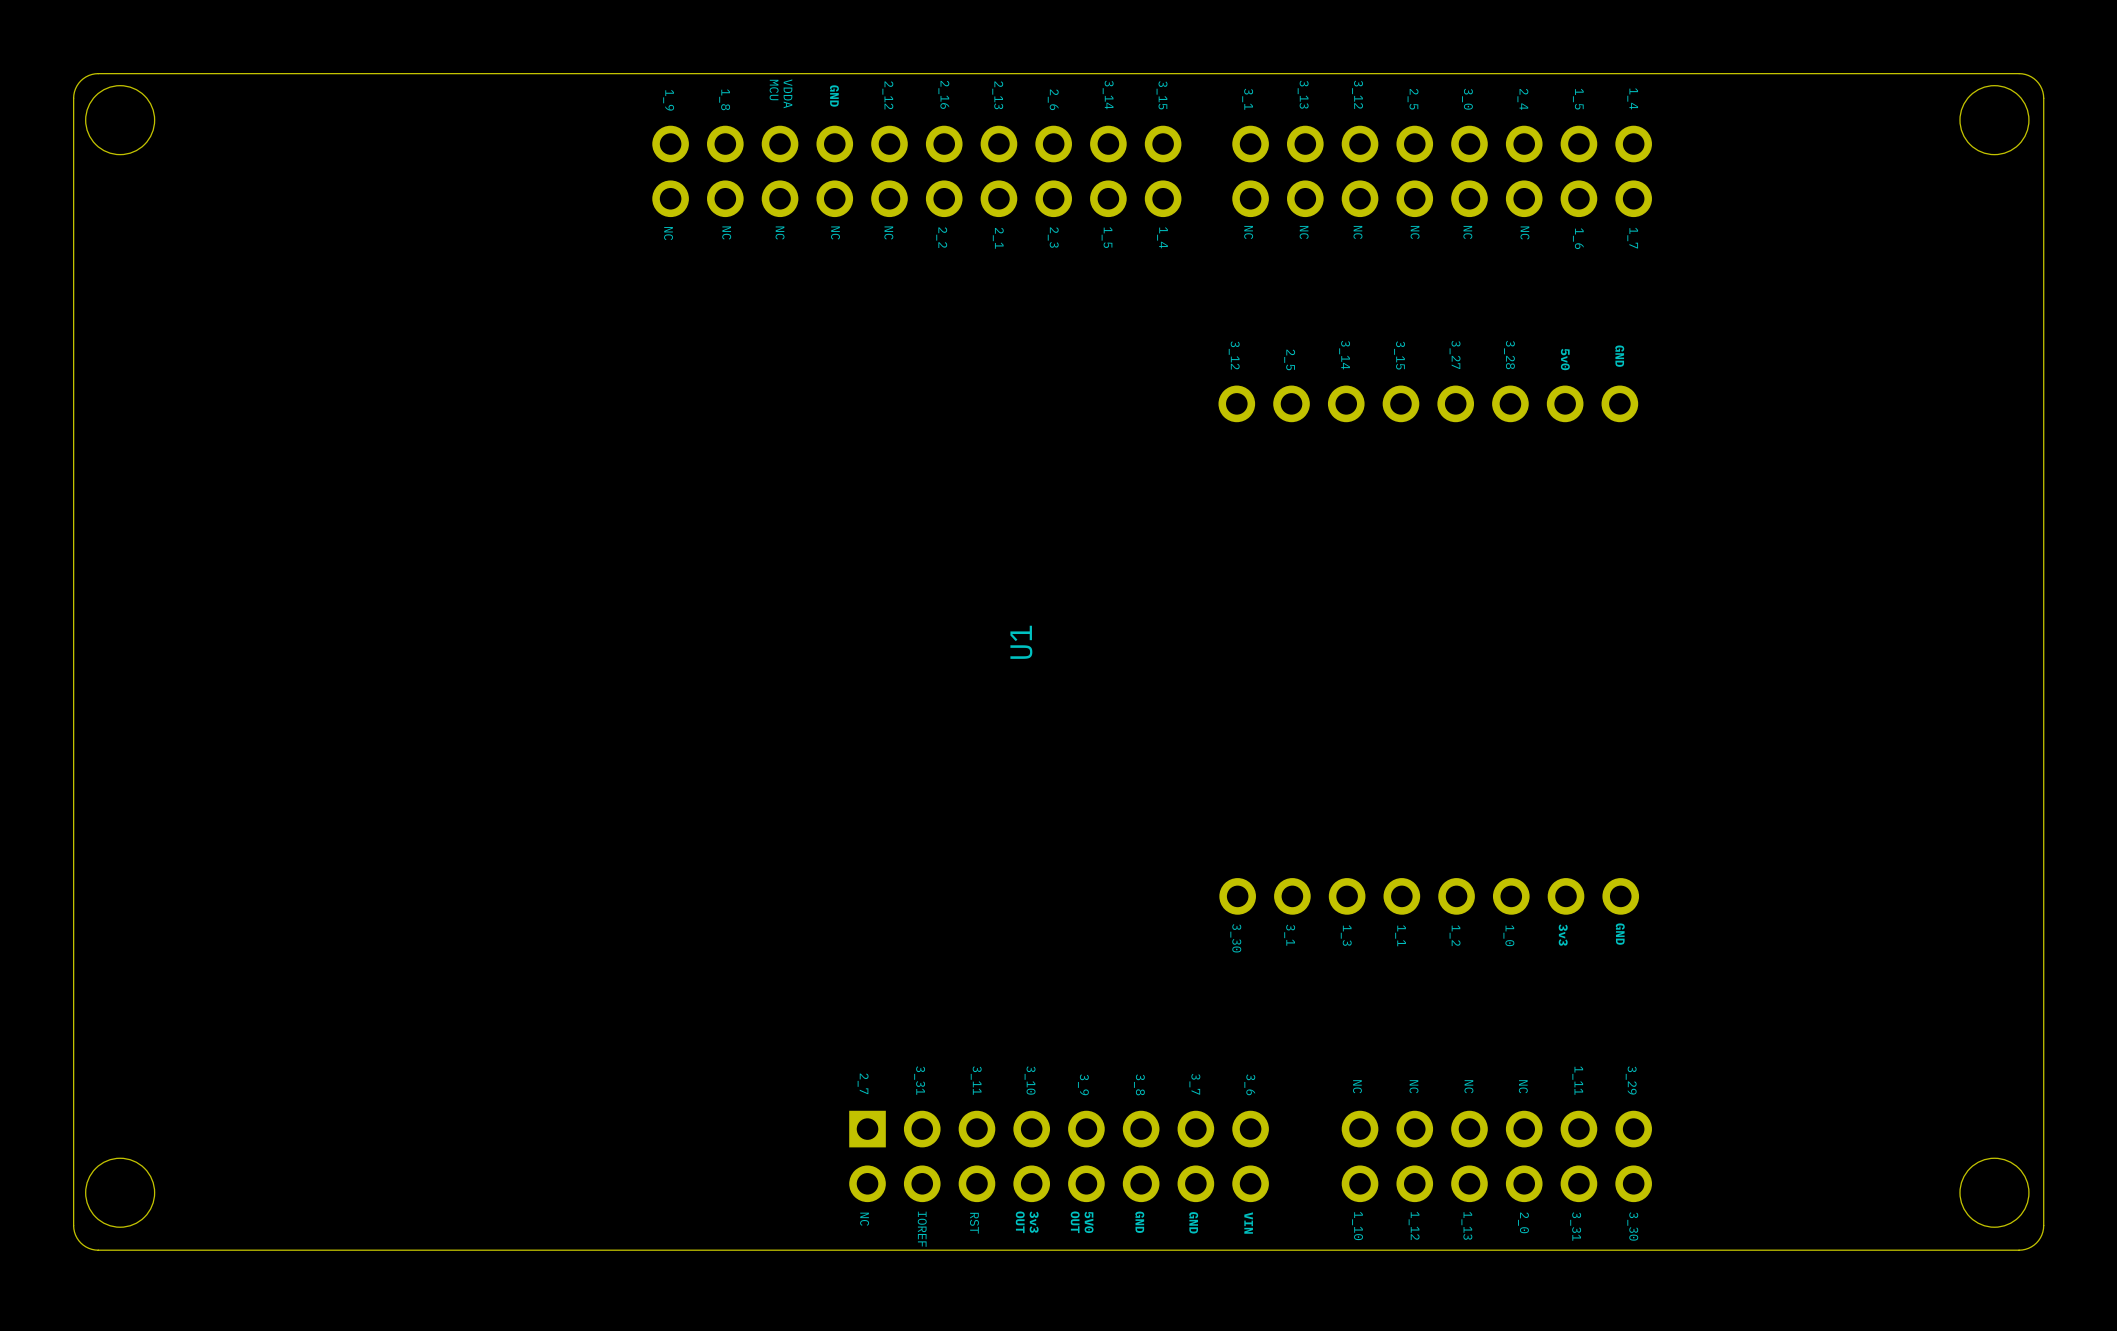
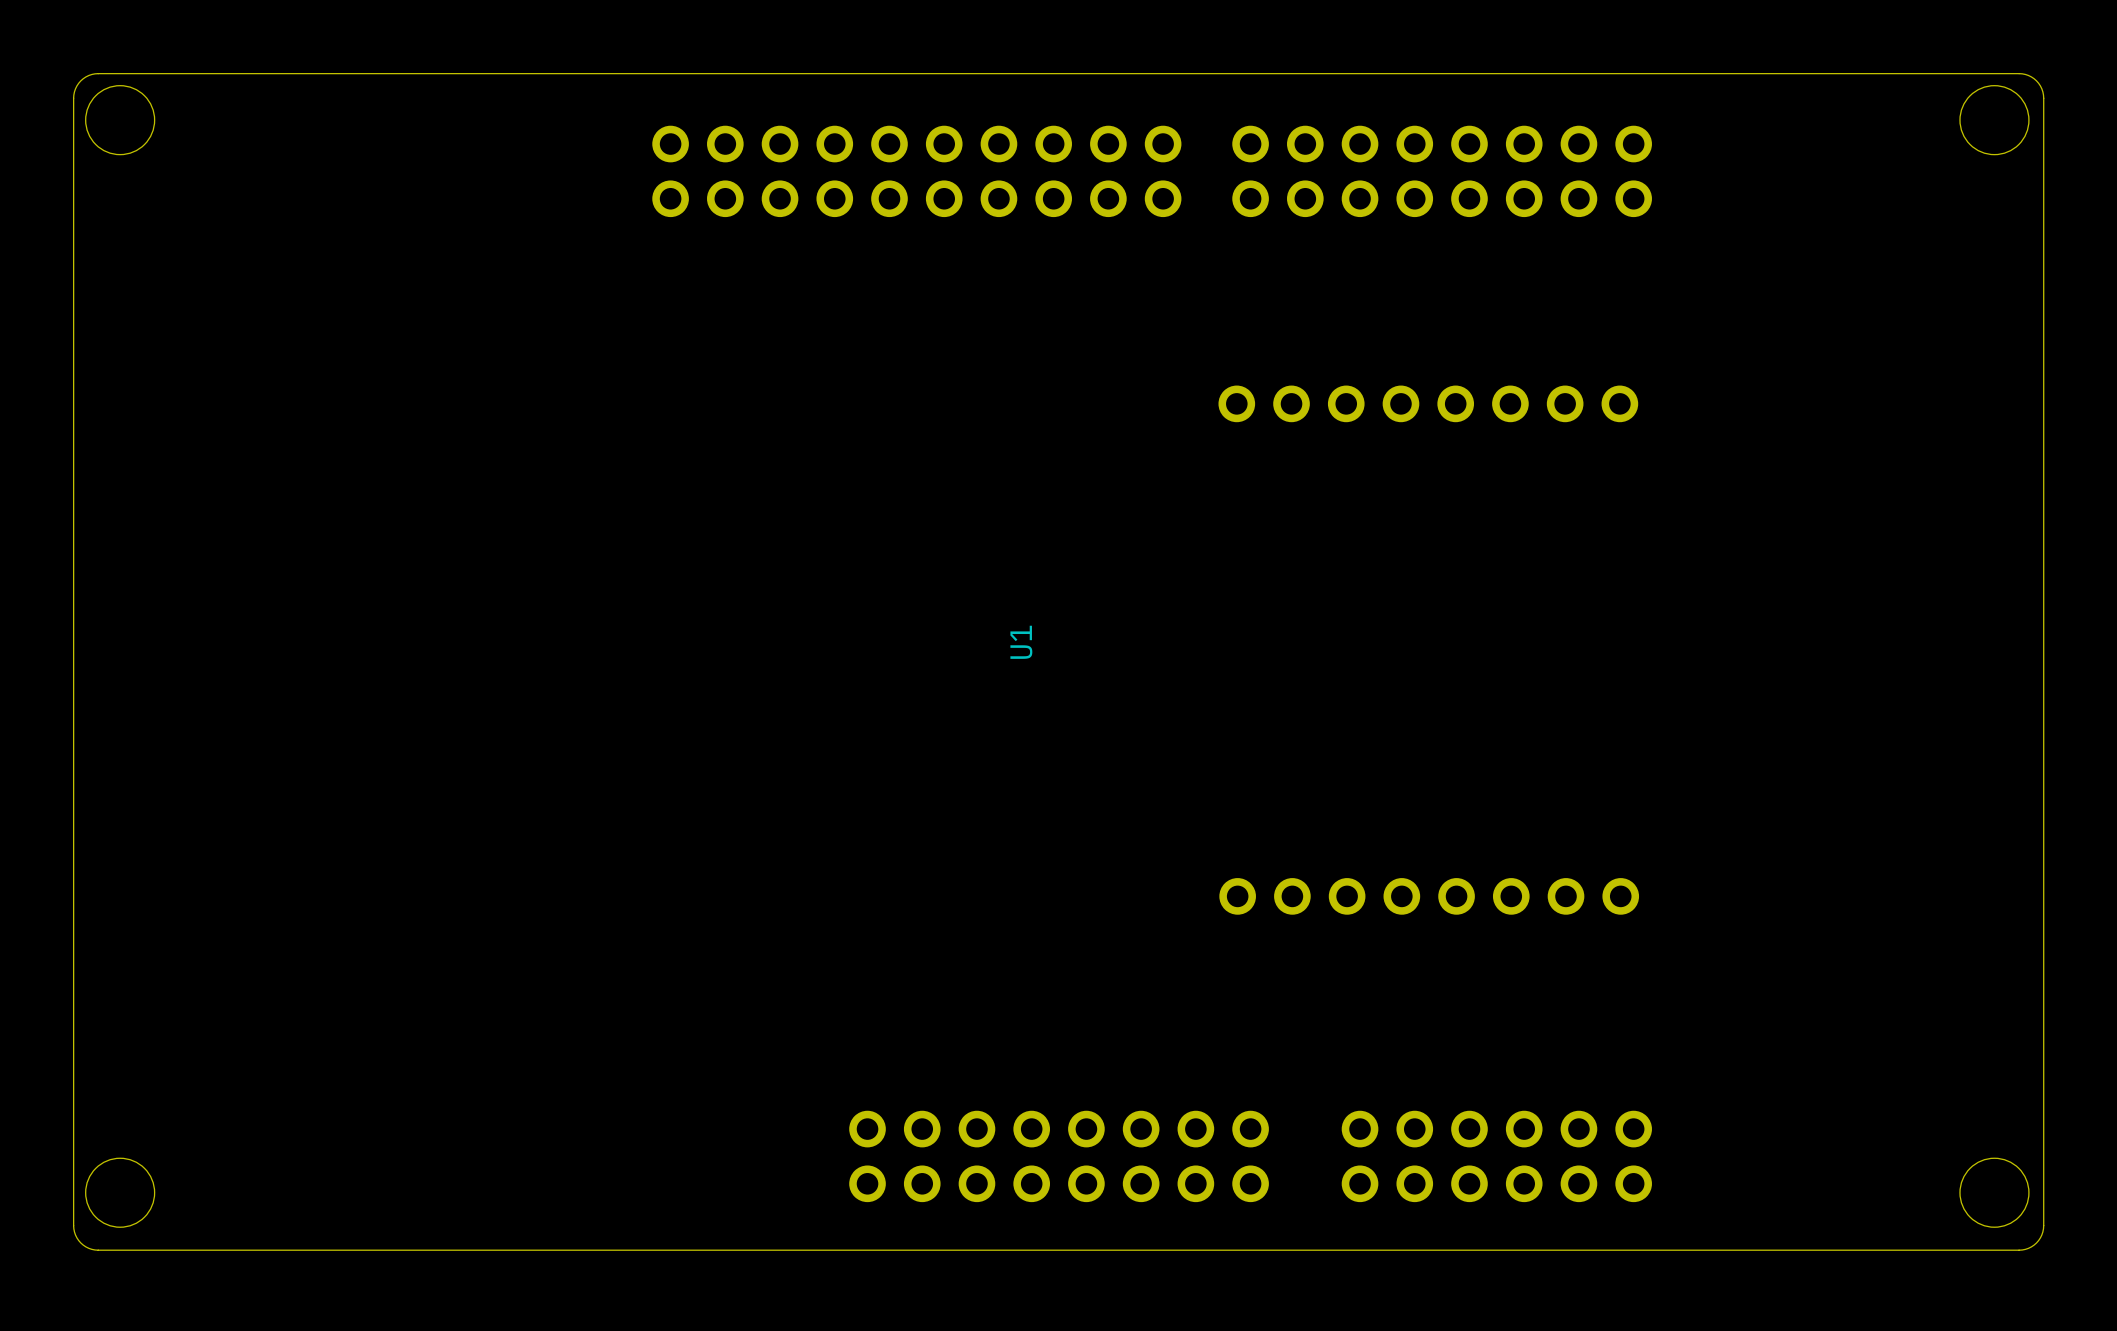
text: MCU (774, 90) -> none
text: VDDA (787, 93) -> none
text: 2_16 (943, 94) -> none
text: 3_14 (1108, 94) -> none
text: 3_13 (1303, 94) -> none
text: 3_12 (1357, 94) -> none
text: 2_12 (887, 95) -> none
text: 2_13 (997, 95) -> none
text: 3_15 (1162, 95) -> none
text: GND (834, 96) -> none
text: 1_4 (1632, 98) -> none
text: 1_8 (724, 99) -> none
text: 2_6 (1053, 99) -> none
text: 3_1 (1247, 99) -> none
text: 2_5 (1413, 99) -> none
text: 3_0 (1467, 99) -> none
text: 2_4 (1522, 99) -> none
text: 1_5 (1578, 99) -> none
text: 1_9 (668, 100) -> none
U1 footprint: [652, 125, 1652, 1203] -> [652, 125, 1652, 1203]
text: NC (1248, 232) -> none
text: NC (1304, 232) -> none
text: NC (1357, 232) -> none
text: NC (1415, 232) -> none
text: NC (1467, 232) -> none
text: NC (668, 233) -> none
text: NC (726, 233) -> none
text: NC (780, 233) -> none
text: NC (835, 233) -> none
text: NC (888, 233) -> none
text: NC (1524, 233) -> none
text: 2_2 (941, 237) -> none
text: 2_3 (1053, 237) -> none
text: 1_5 (1107, 237) -> none
text: 1_4 (1162, 237) -> none
text: 2_1 (998, 238) -> none
text: 1_6 (1578, 238) -> none
text: 1_7 (1632, 238) -> none
text: 3_27 (1455, 354) -> none
text: 3_28 (1509, 354) -> none
text: 3_12 (1234, 355) -> none
text: 3_14 (1344, 355) -> none
text: 3_15 (1399, 355) -> none
text: GND (1619, 356) -> none
text: 2_5 (1289, 359) -> none
text: 5v0 (1565, 359) -> none
text: GND (1620, 934) -> none
text: 3_1 (1289, 935) -> none
text: 1_3 (1346, 935) -> none
text: 1_1 (1400, 935) -> none
text: 1_2 (1455, 935) -> none
text: 1_0 (1508, 935) -> none
text: 3v3 (1563, 935) -> none
text: 3_30 (1235, 938) -> none
text: 3_31 (919, 1080) -> none
text: 3_11 (976, 1080) -> none
text: 3_10 (1030, 1080) -> none
text: 1_11 (1577, 1080) -> none
text: 3_29 (1631, 1080) -> none
text: 2_7 (863, 1083) -> none
text: 3_9 (1083, 1084) -> none
text: 3_8 (1139, 1084) -> none
text: 3_7 (1194, 1084) -> none
text: 3_6 (1249, 1084) -> none
text: NC (1357, 1086) -> none
text: NC (1413, 1086) -> none
text: NC (1468, 1086) -> none
text: NC (1523, 1086) -> none
text: NC (864, 1219) -> none
text: OUT (1020, 1222) -> none
text: 3v3 (1034, 1222) -> none
text: OUT (1075, 1222) -> none
text: 5V0 (1089, 1222) -> none
text: GND (1139, 1222) -> none
text: GND (1193, 1222) -> none
text: 2_0 (1523, 1222) -> none
text: RST (974, 1223) -> none
text: VIN (1248, 1223) -> none
text: 1_10 (1357, 1225) -> none
text: 1_12 (1414, 1225) -> none
text: 1_13 (1466, 1225) -> none
text: 3_31 (1575, 1226) -> none
text: 3_30 (1632, 1226) -> none
text: IOREF (922, 1229) -> none

